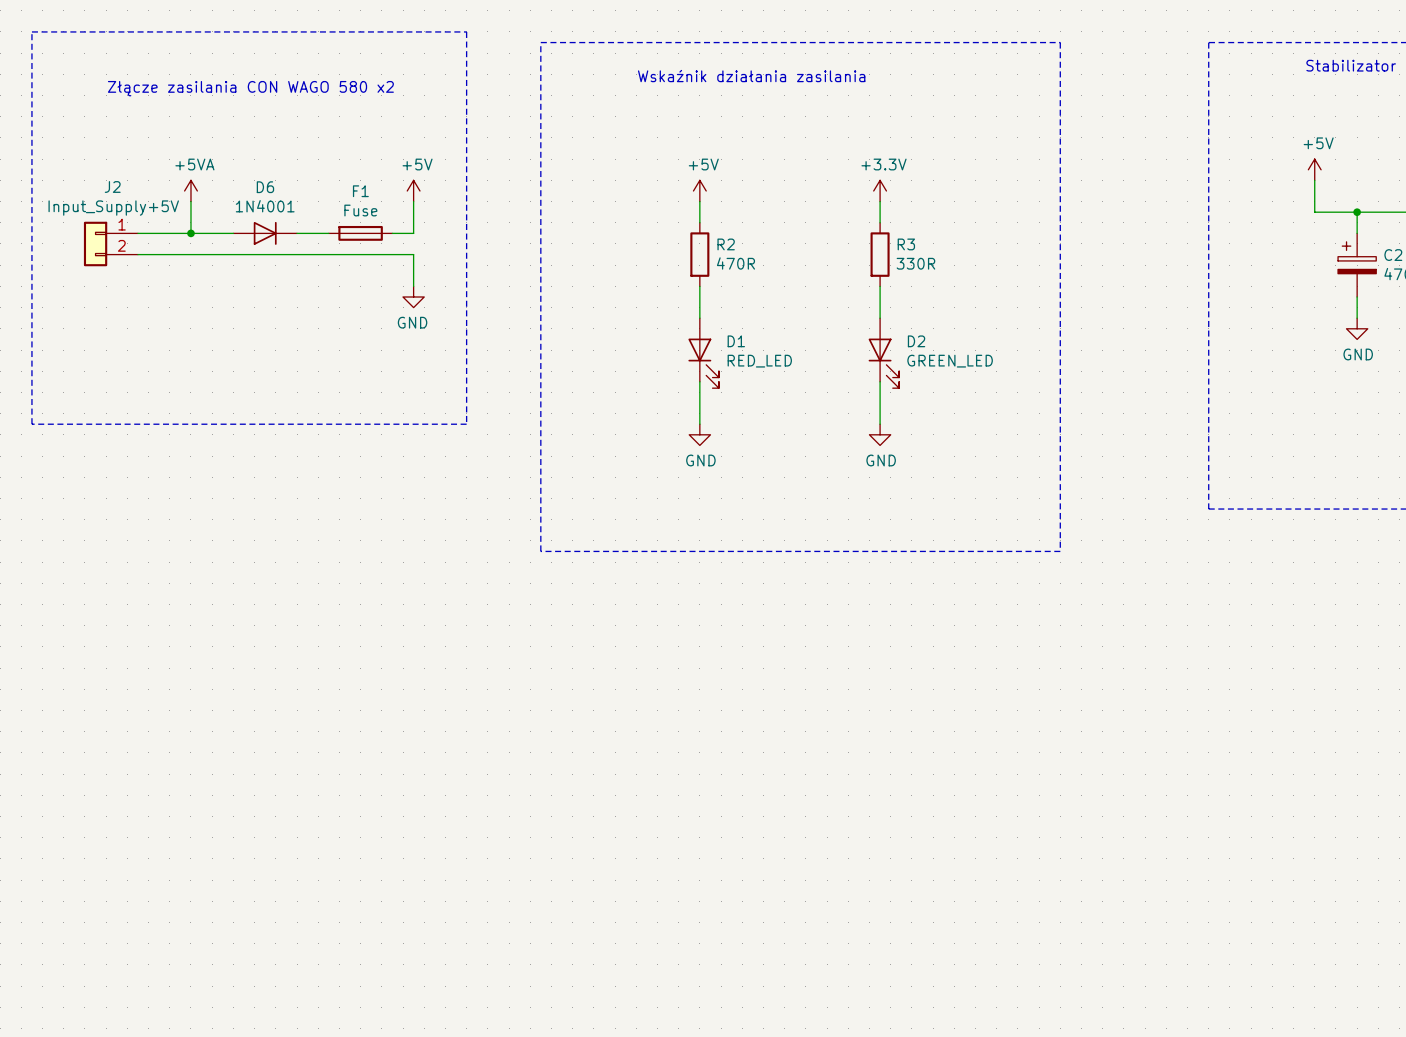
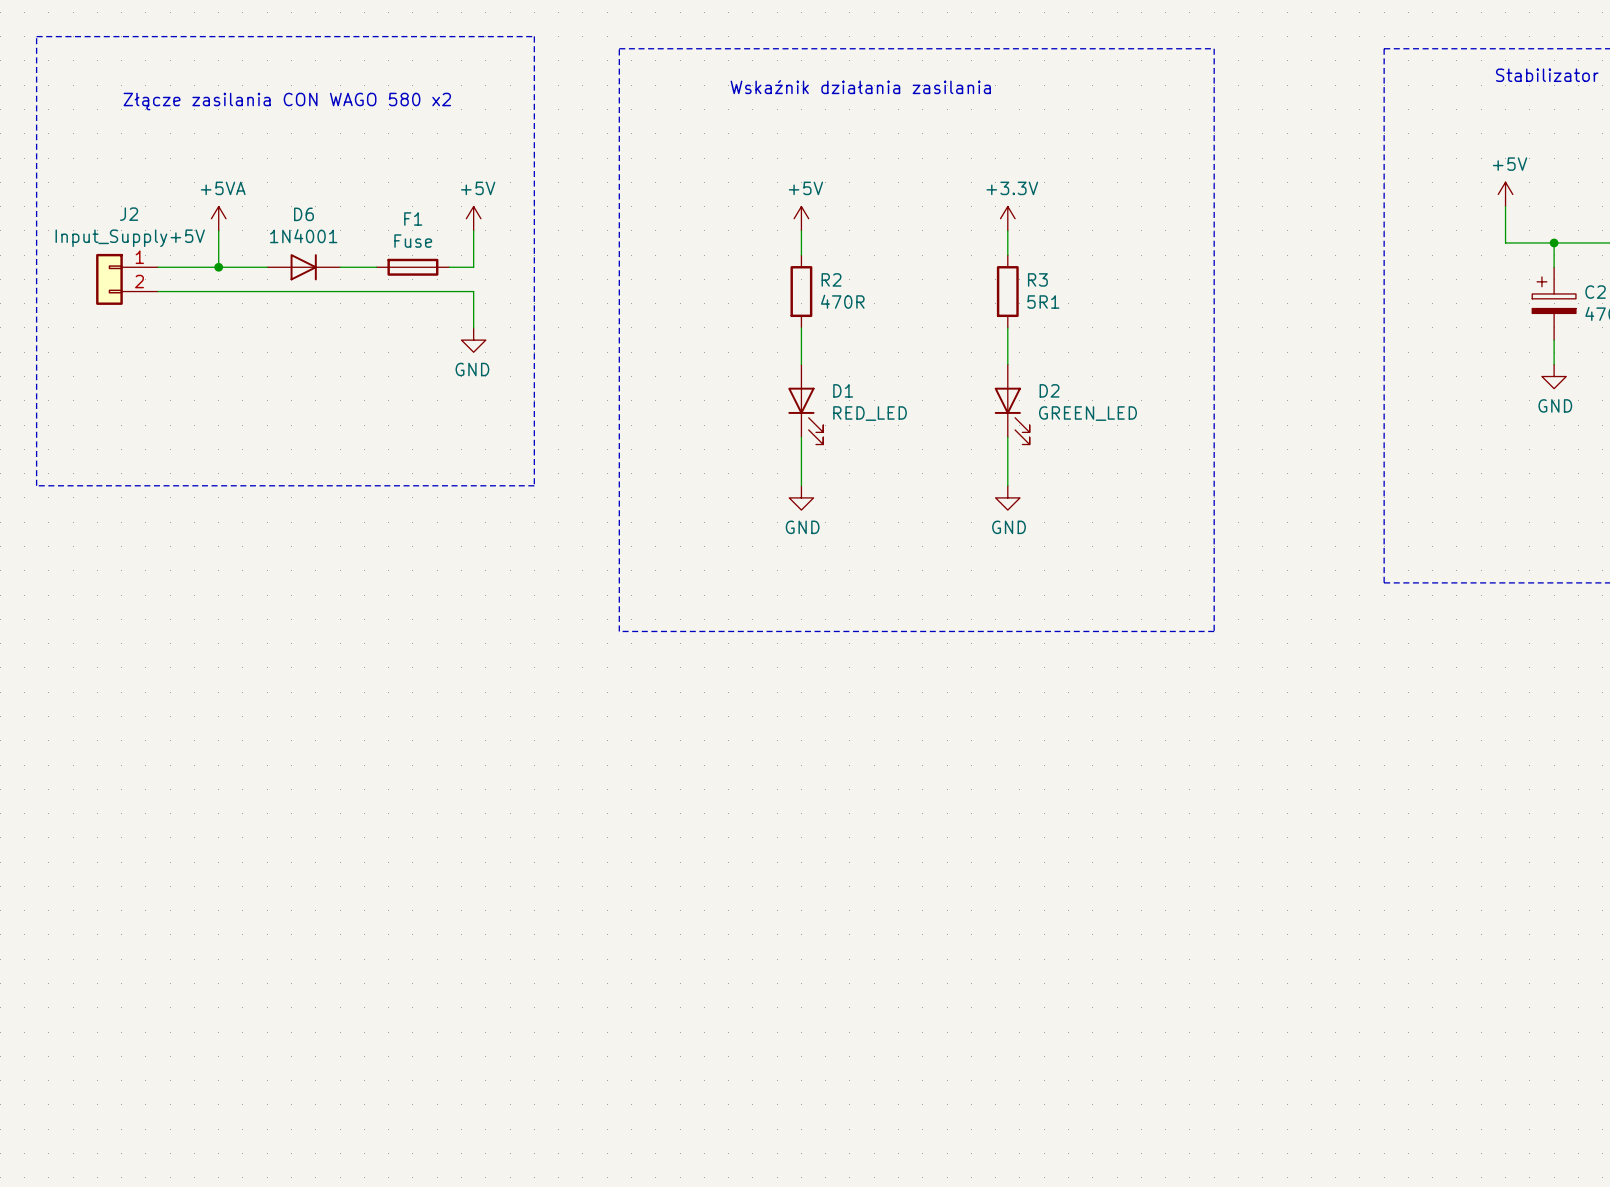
R3 value: 330R (915, 263) -> 5R1 (1043, 302)

